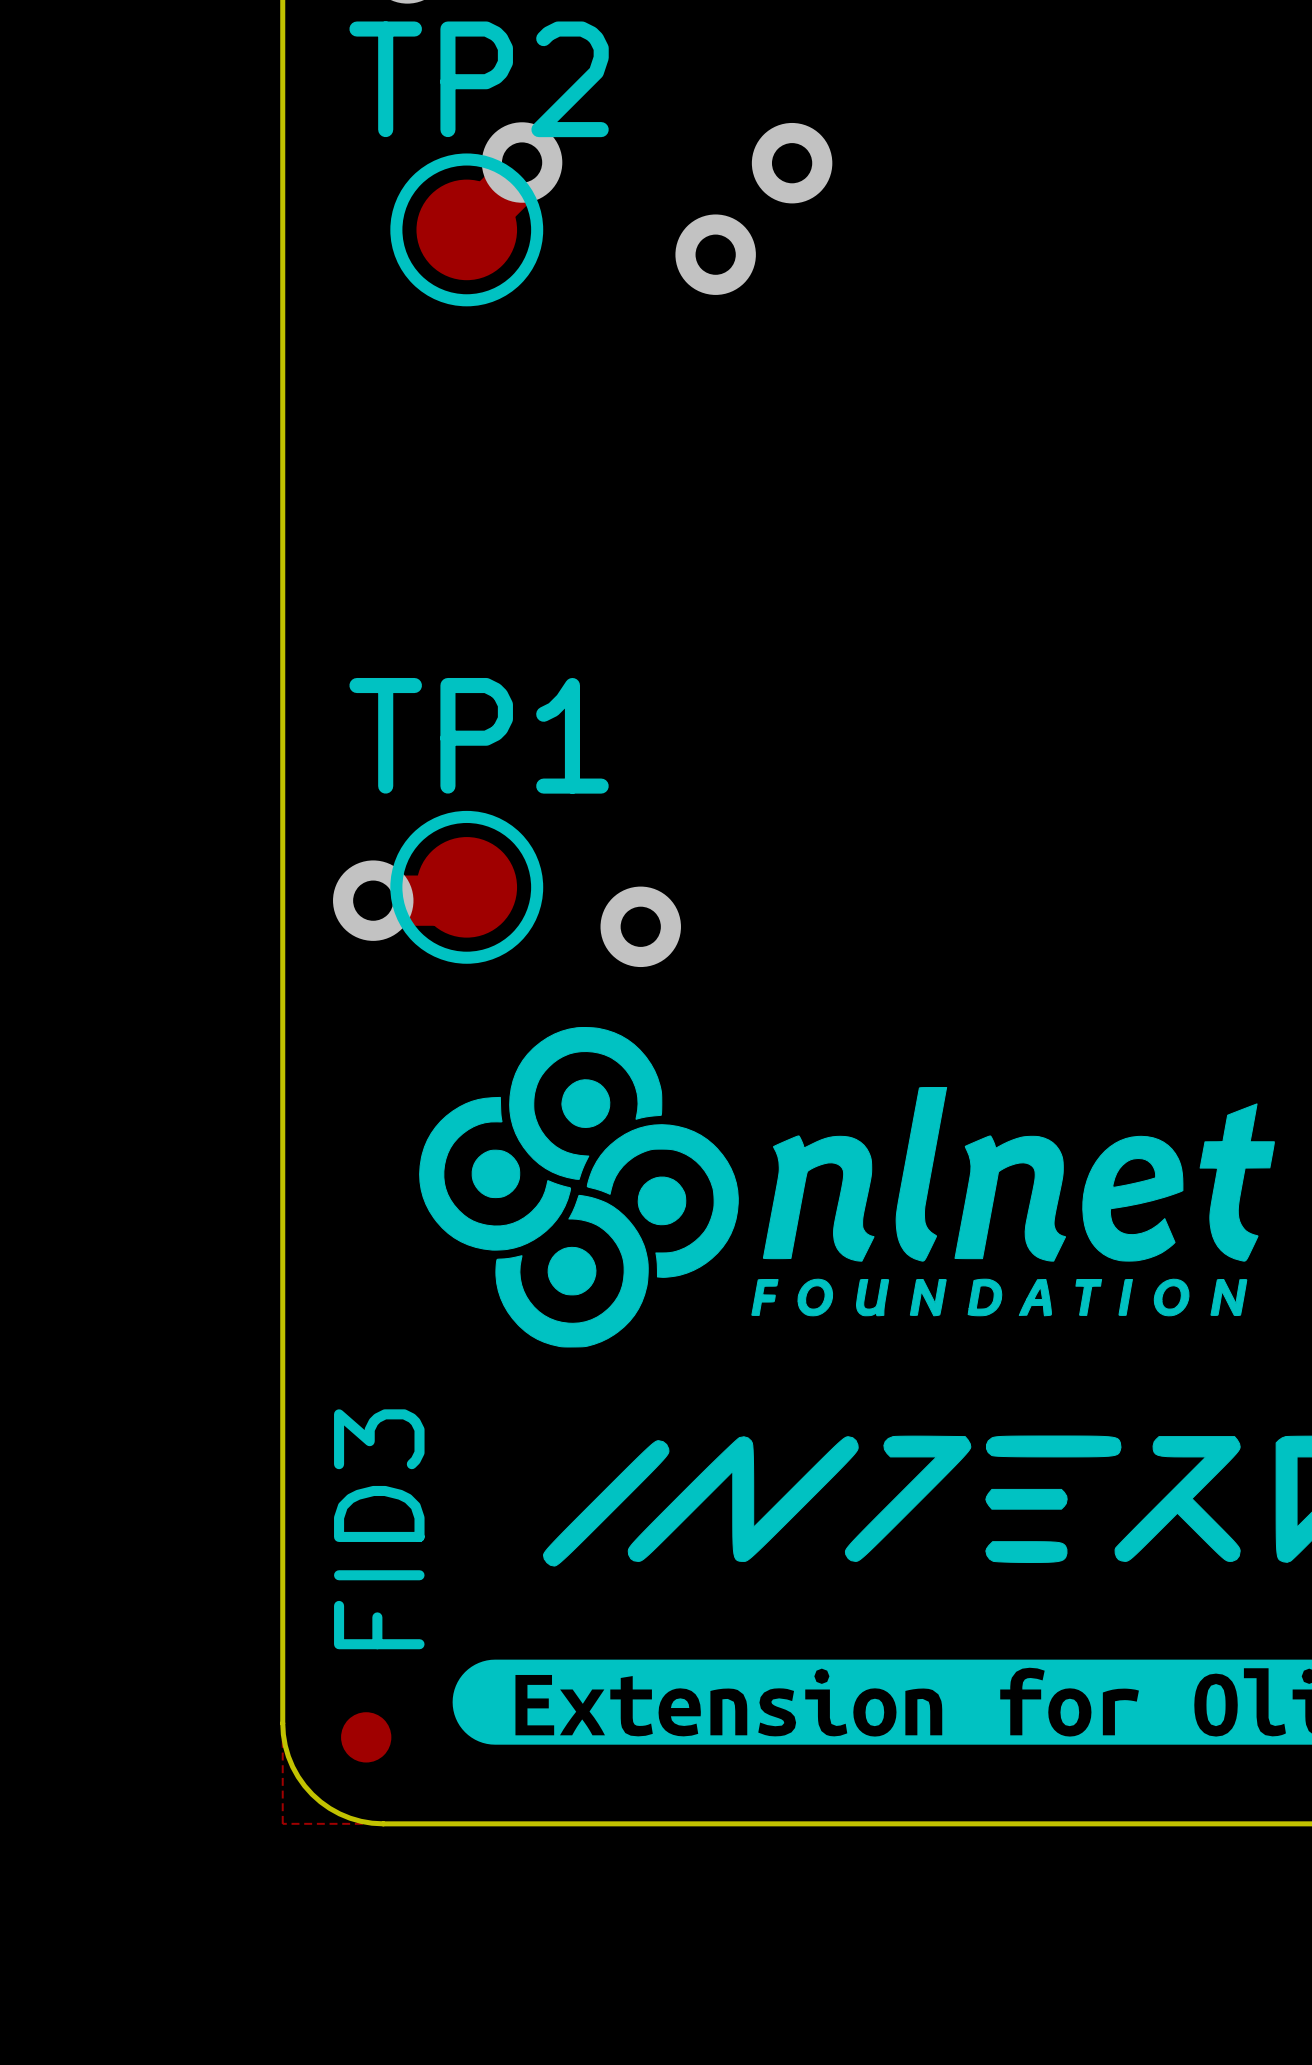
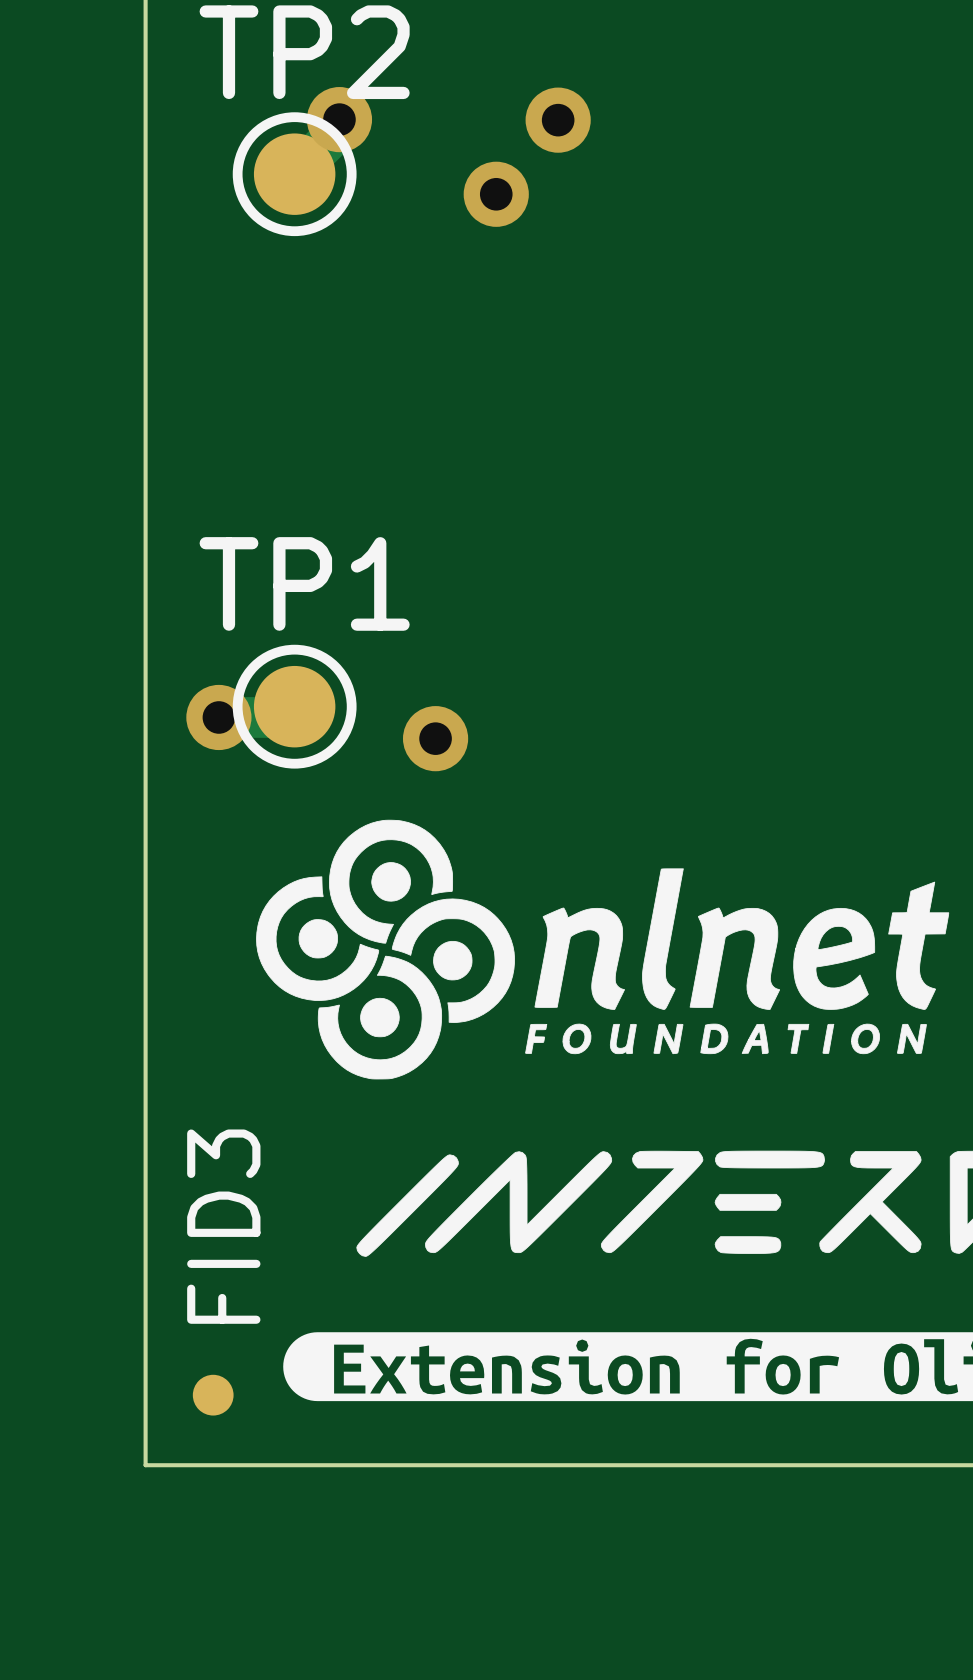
board edge: (282, 1723) (285, 1745) (292, 1766) (312, 1794) (339, 1813) (360, 1821) (383, 1823) -> (145, 1383) (145, 1465) (227, 1465)

